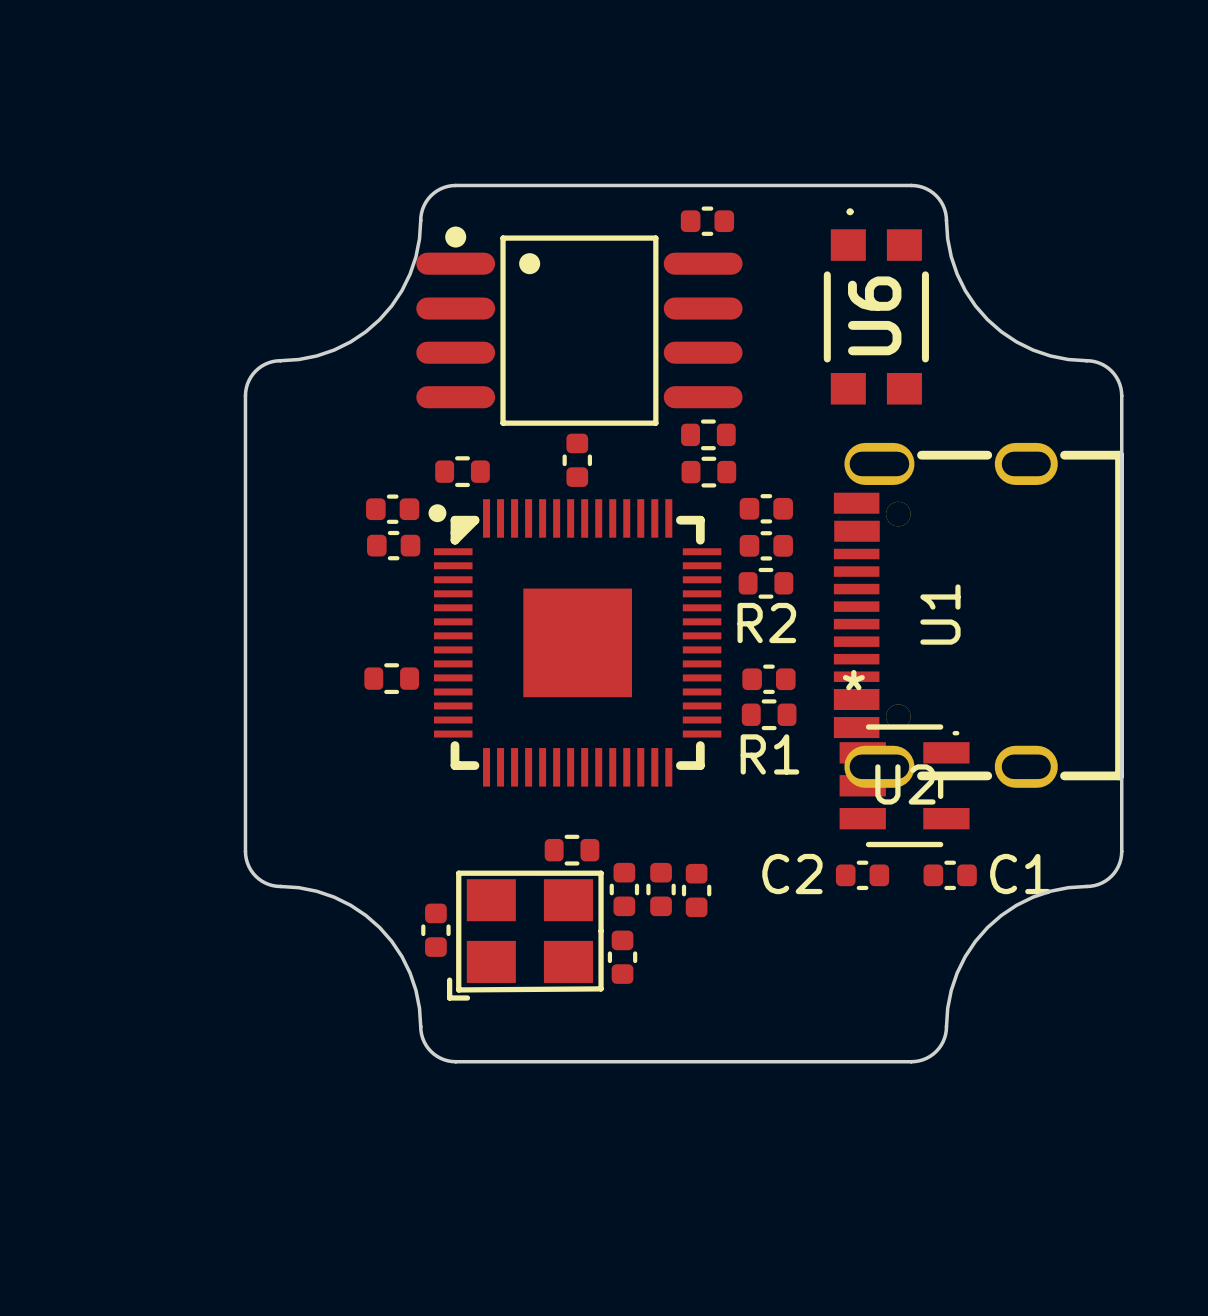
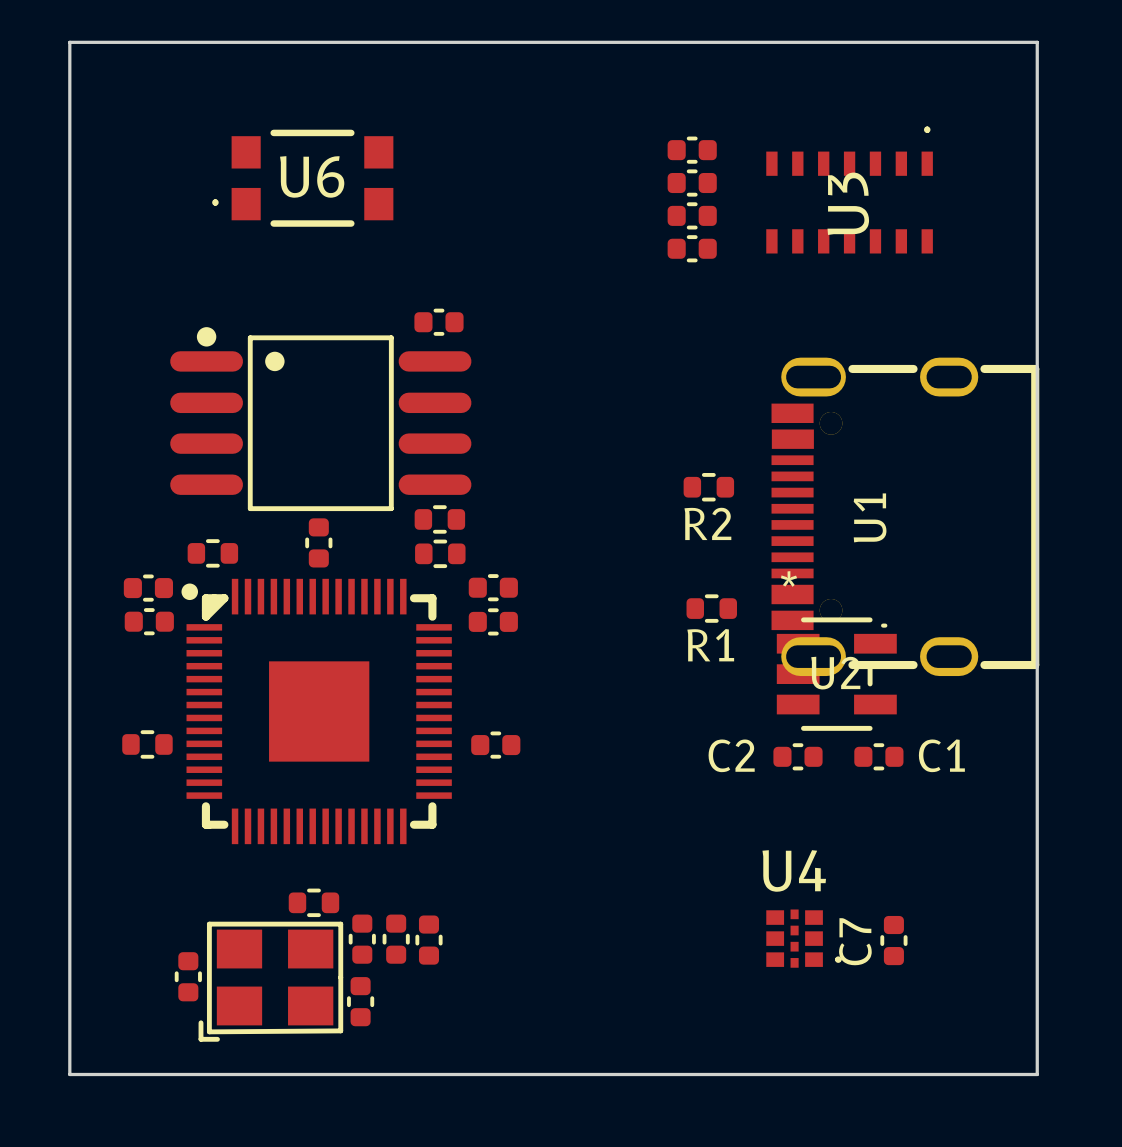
part: none -> (692, 150)
part: (707, 221) -> none
part: none -> (692, 183)
U3: none -> (849, 190)
part: none -> (692, 215)
U6 rotation: 0° (876, 306) -> 90° counterclockwise (302, 178)
U6 position: (876, 306) -> (302, 178)
part: none -> (692, 248)
part position: (579, 326) -> (320, 419)
board edge: (1121, 395) (1116, 377) (1105, 366) (1094, 361) (1068, 359) (1033, 350) (1001, 331) (987, 319) (965, 290) (957, 274) (947, 238) (945, 212) (941, 201) (926, 188) (911, 185) (455, 185) (444, 187) (430, 195) (424, 205) (415, 256) (410, 274) (401, 290) (379, 319) (365, 331) (334, 350) (298, 359) (272, 361) (261, 366) (248, 380) (245, 395) (245, 851) (247, 863) (255, 876) (265, 883) (316, 891) (334, 897) (350, 905) (379, 927) (391, 941) (410, 973) (419, 1008) (422, 1038) (428, 1048) (440, 1058) (455, 1061) (911, 1061) (923, 1059) (933, 1054) (943, 1041) (951, 990) (957, 973) (975, 941) (987, 927) (1016, 905) (1033, 897) (1068, 887) (1094, 885) (1105, 881) (1118, 866) (1121, 851) -> (1037, 314) (1037, 42) (69, 42) (69, 1074) (1037, 1074) (1037, 734)
part: none -> (438, 322)
part: (708, 434) -> none
part: (577, 460) -> none
part: (462, 471) -> none
part: (708, 472) -> none
part: (766, 508) -> none
part: (392, 509) -> none
part: (393, 545) -> none
part: (766, 545) -> none
part: none -> (439, 519)
part position: (574, 642) -> (316, 711)
part: none -> (318, 542)
part: none -> (212, 553)
part: none -> (440, 553)
part: (391, 678) -> none
part: (768, 679) -> none
part: none -> (148, 588)
part: none -> (493, 587)
part: none -> (149, 621)
part: none -> (493, 621)
part: (572, 850) -> none
part: none -> (147, 744)
part: none -> (495, 745)
part: (624, 889) -> none
part: (661, 889) -> none
part: (696, 890) -> none
part: (435, 930) -> none
part position: (525, 935) -> (270, 981)
part: (622, 957) -> none
part: none -> (313, 902)
part: none -> (362, 939)
part: none -> (396, 939)
U4: none -> (803, 938)
part: none -> (428, 940)
C7: none -> (893, 940)
part: none -> (188, 976)
part: none -> (360, 1001)

